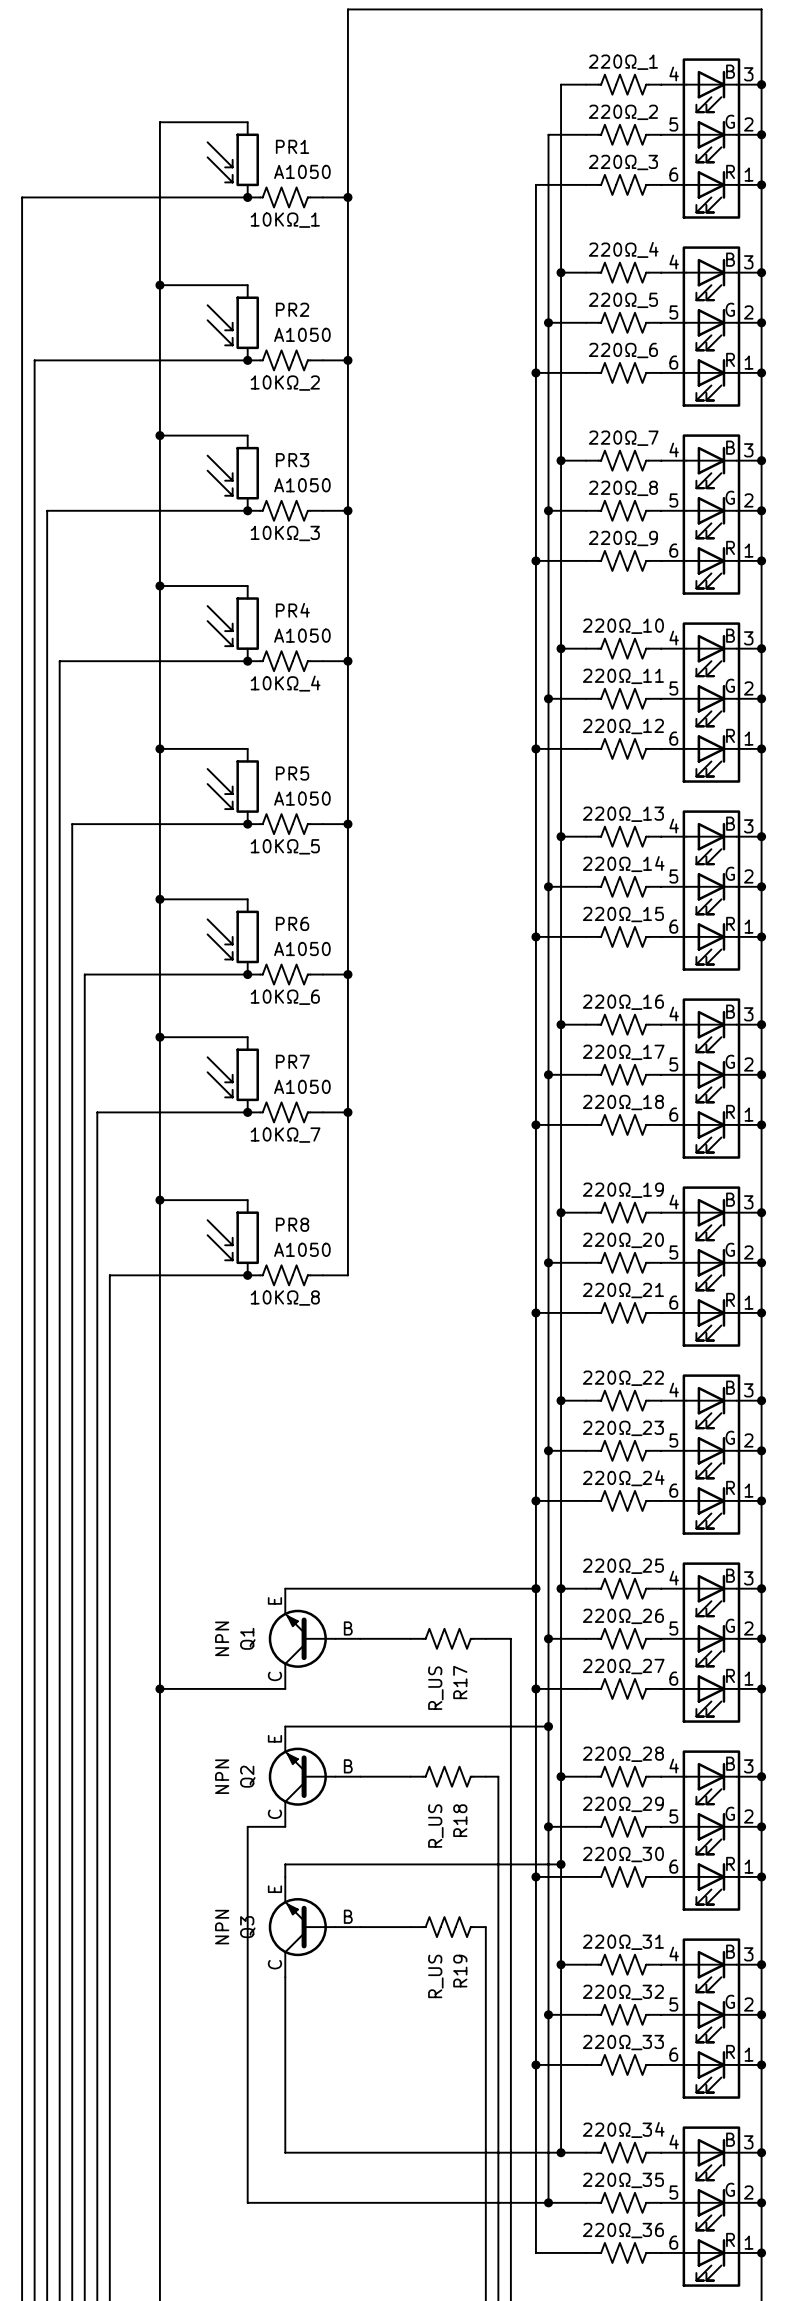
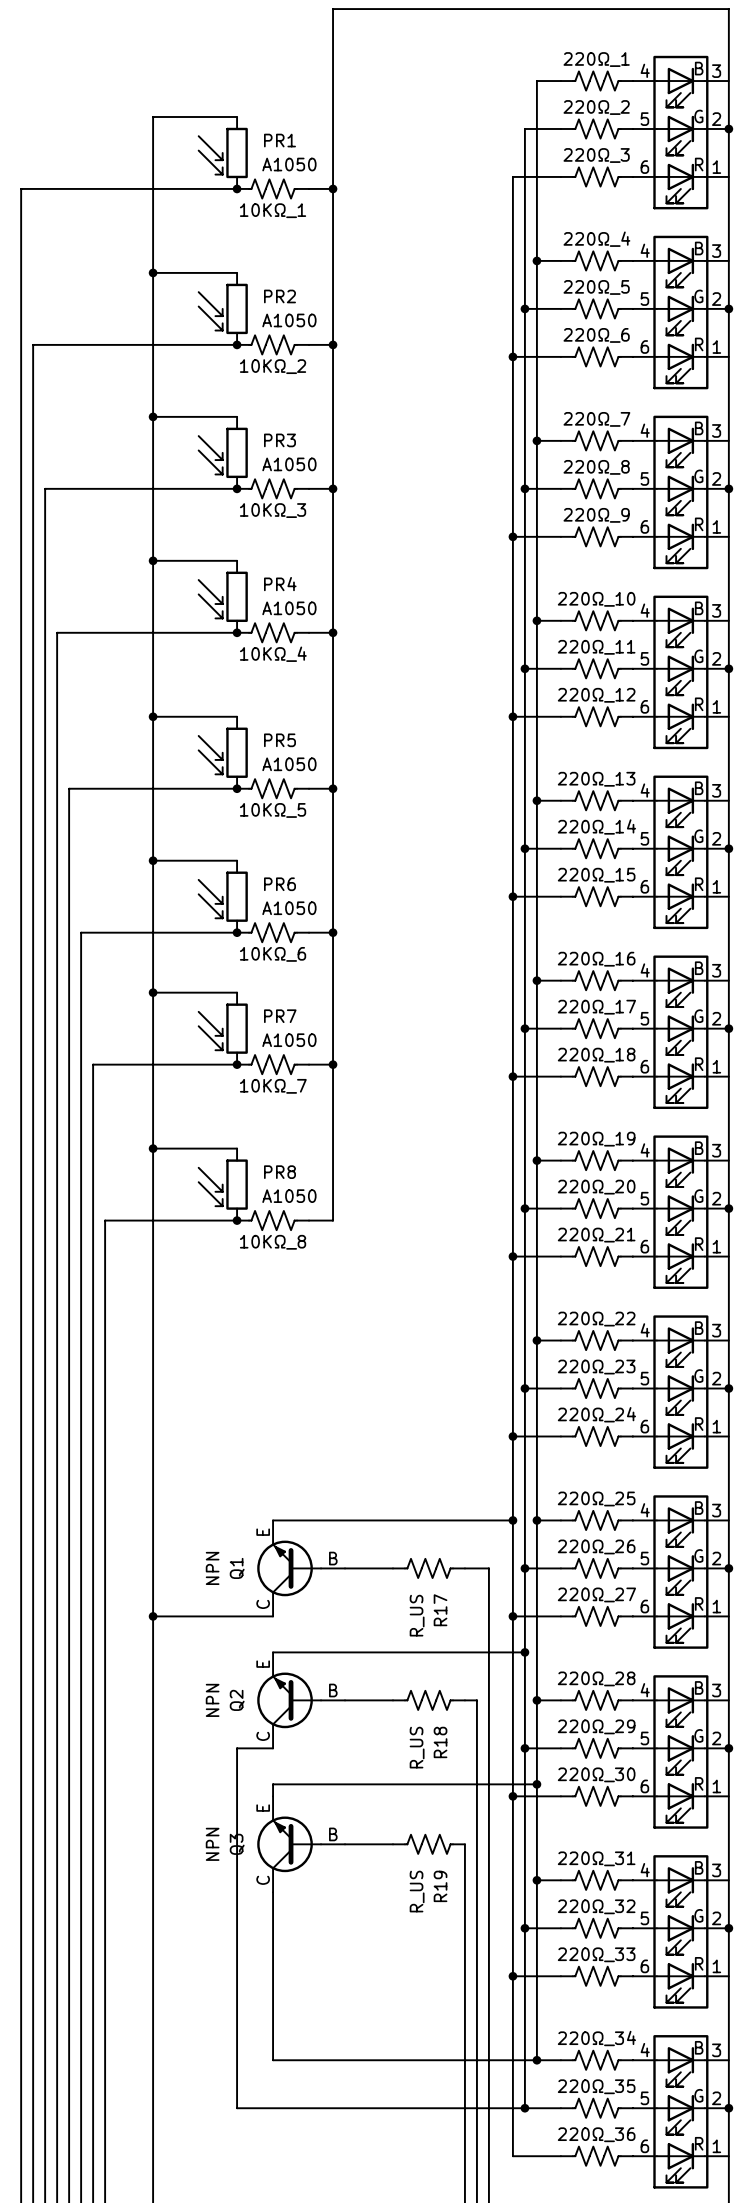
junction: (761, 84) -> none
junction: (761, 184) -> none
junction: (761, 272) -> none
junction: (761, 372) -> none
junction: (761, 460) -> none
junction: (761, 560) -> none
junction: (761, 648) -> none
junction: (761, 748) -> none
junction: (761, 836) -> none
junction: (761, 936) -> none
junction: (761, 1024) -> none
junction: (761, 1124) -> none
junction: (761, 1212) -> none
junction: (761, 1312) -> none
junction: (761, 1400) -> none
junction: (761, 1500) -> none
junction: (761, 1588) -> none
junction: (761, 1688) -> none
junction: (761, 1776) -> none
junction: (761, 1876) -> none
junction: (761, 1964) -> none
junction: (761, 2064) -> none
junction: (761, 2152) -> none
junction: (761, 2252) -> none

